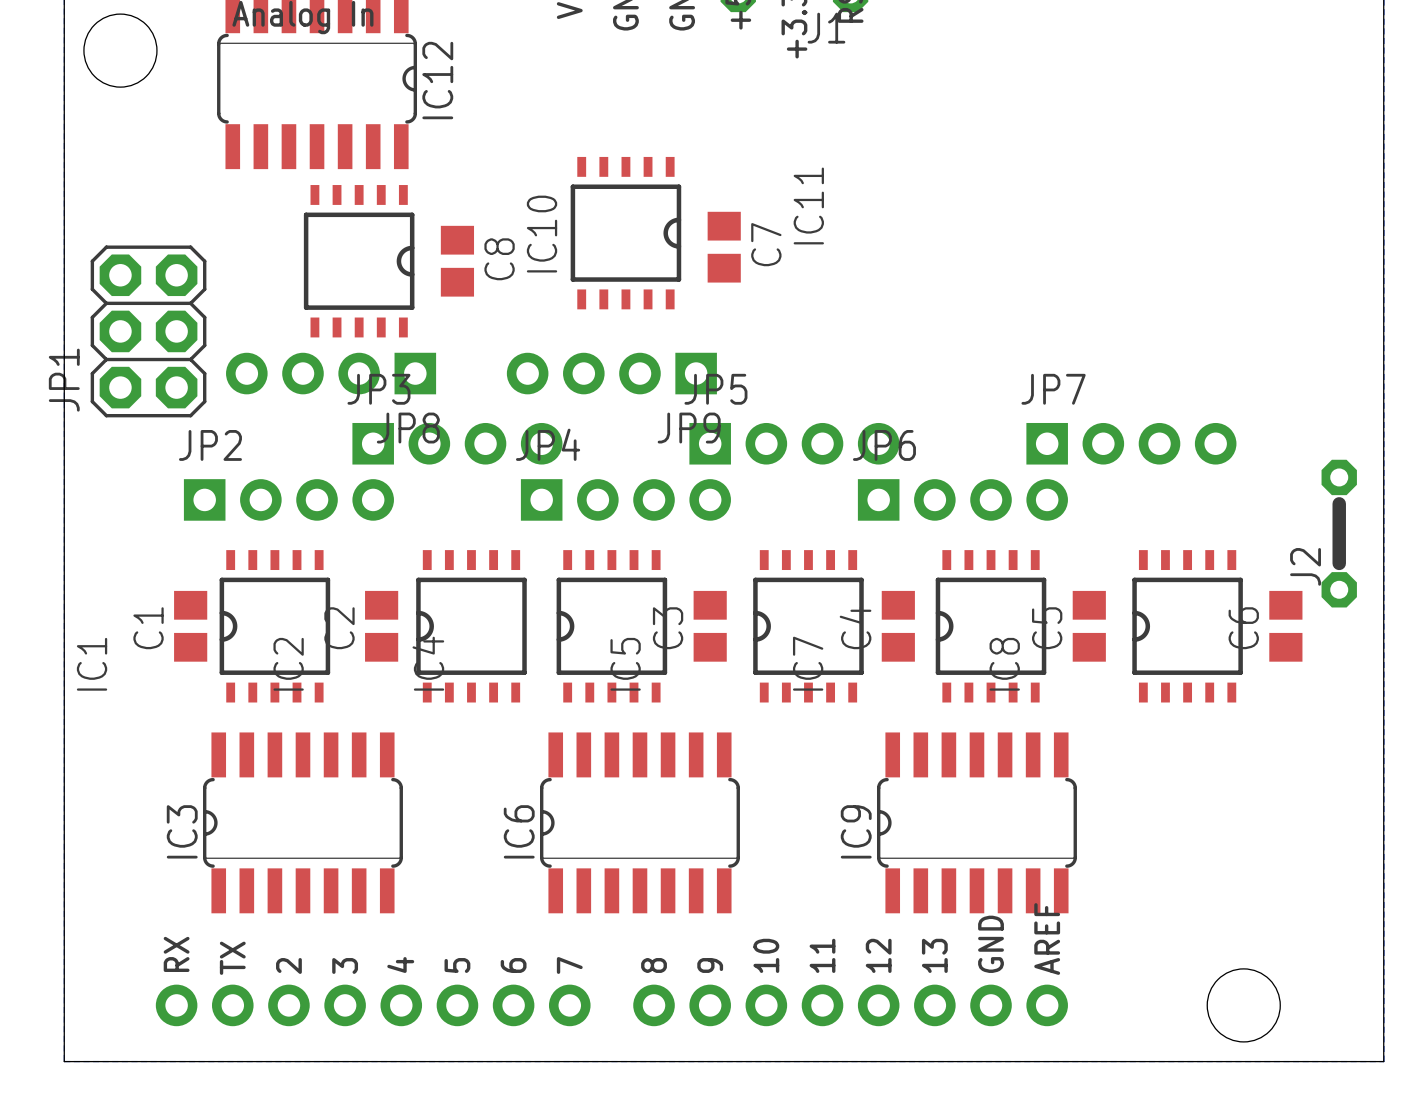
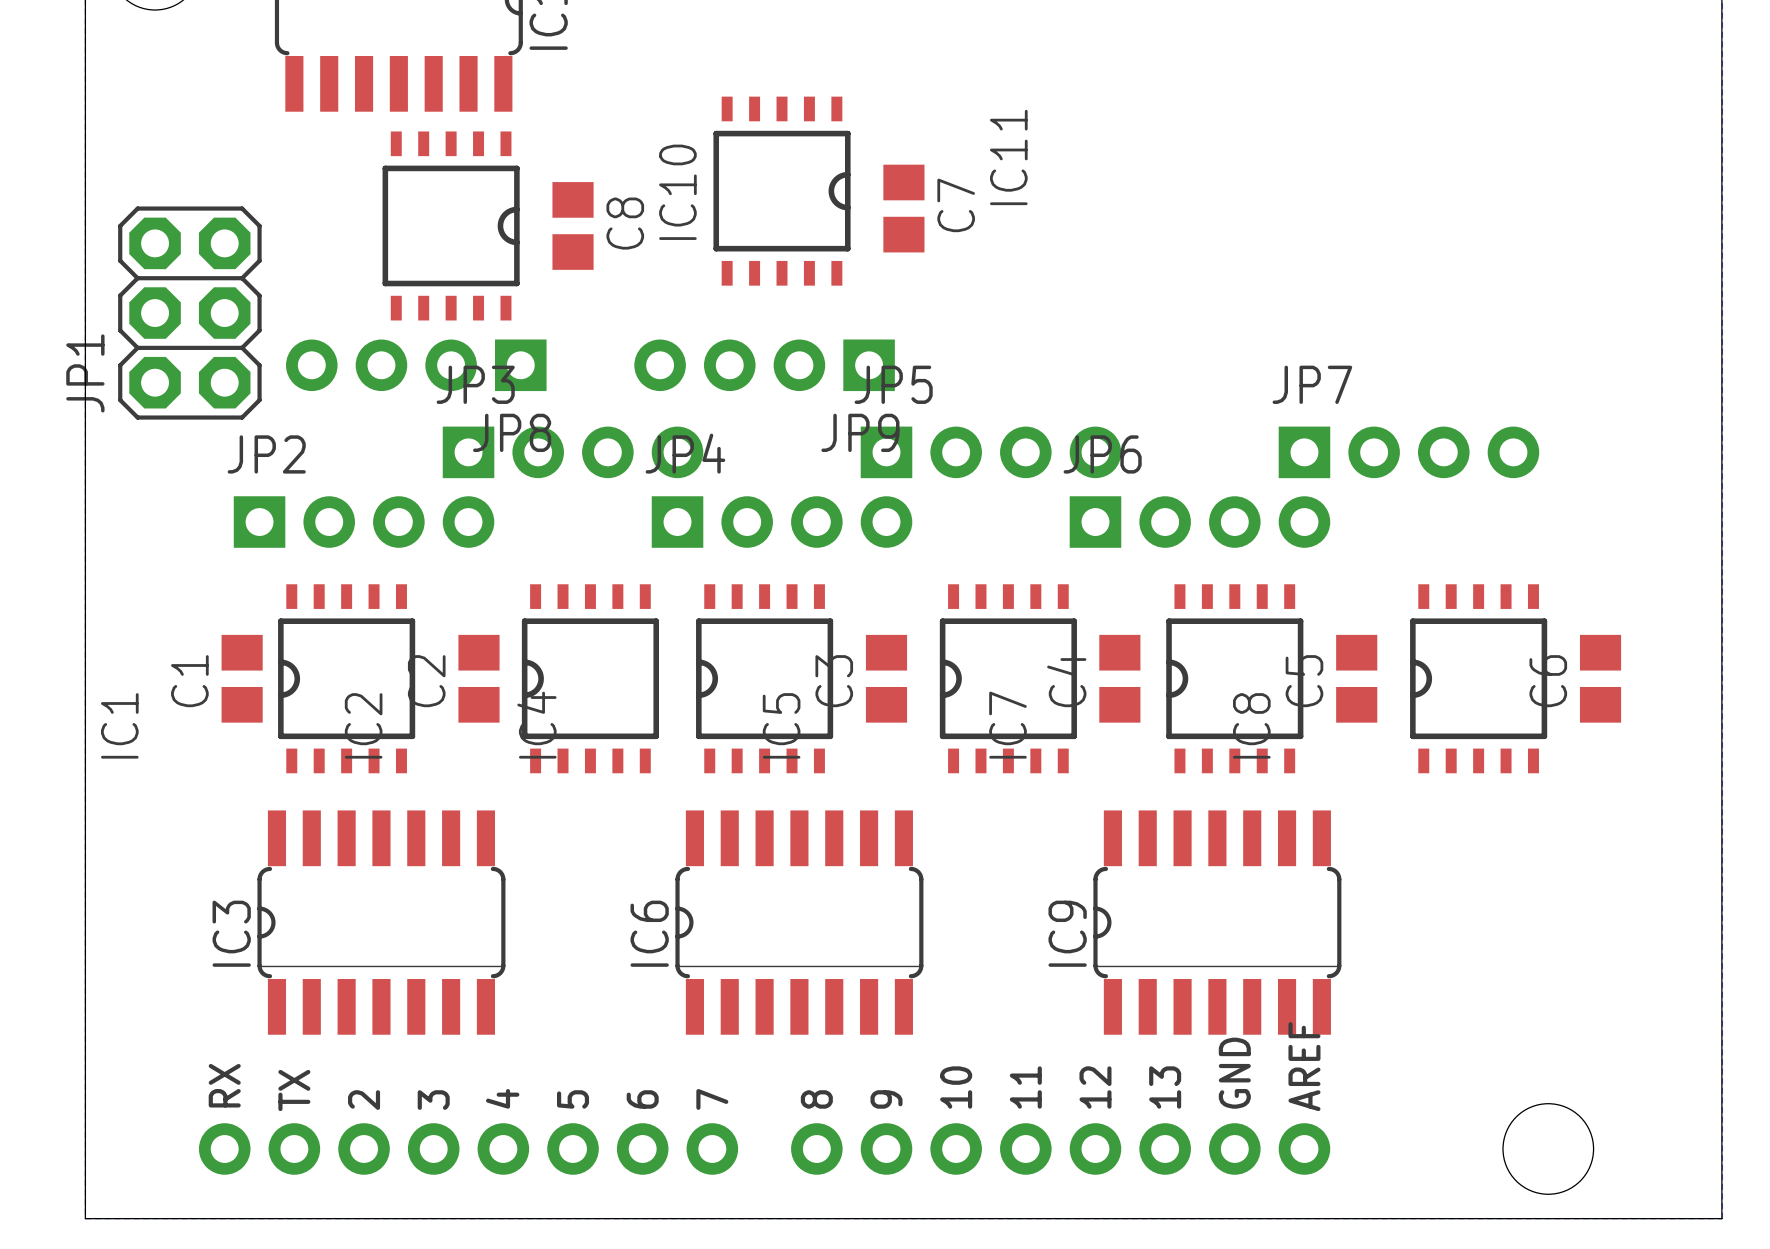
J2: (1339, 533) -> none

